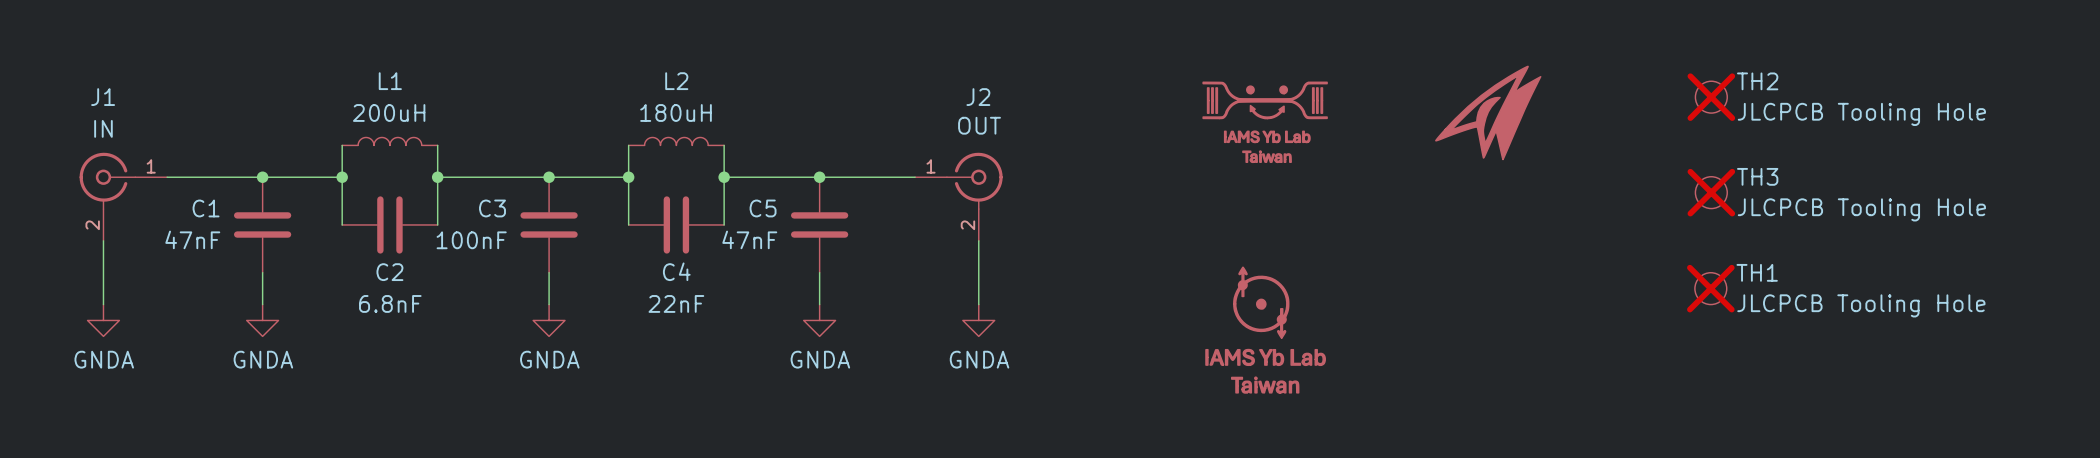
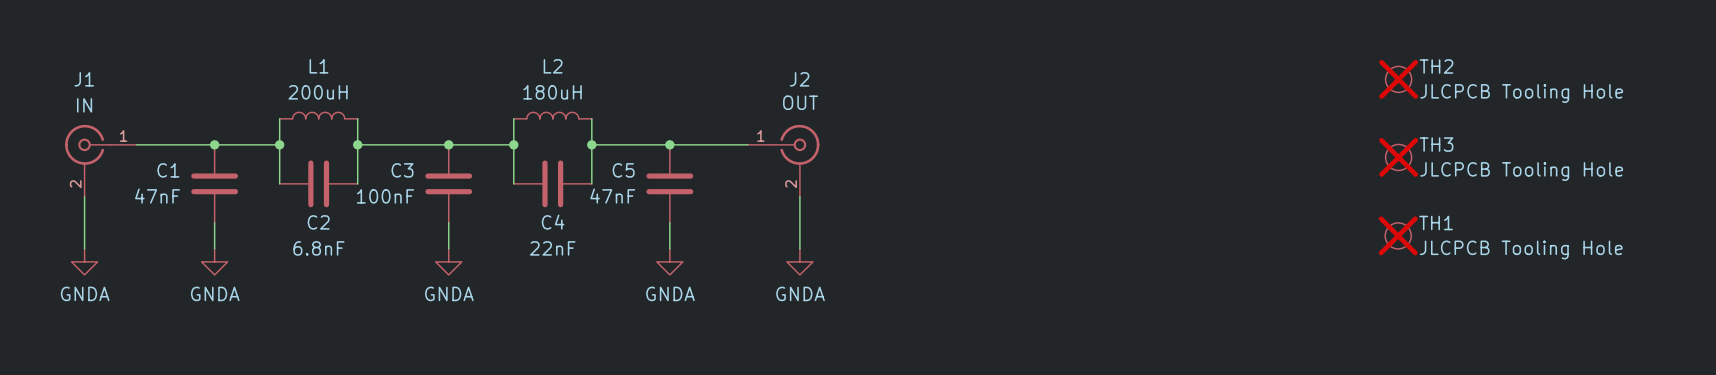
part: (1488, 112) -> none
part: (1265, 122) -> none
part: (1265, 330) -> none

